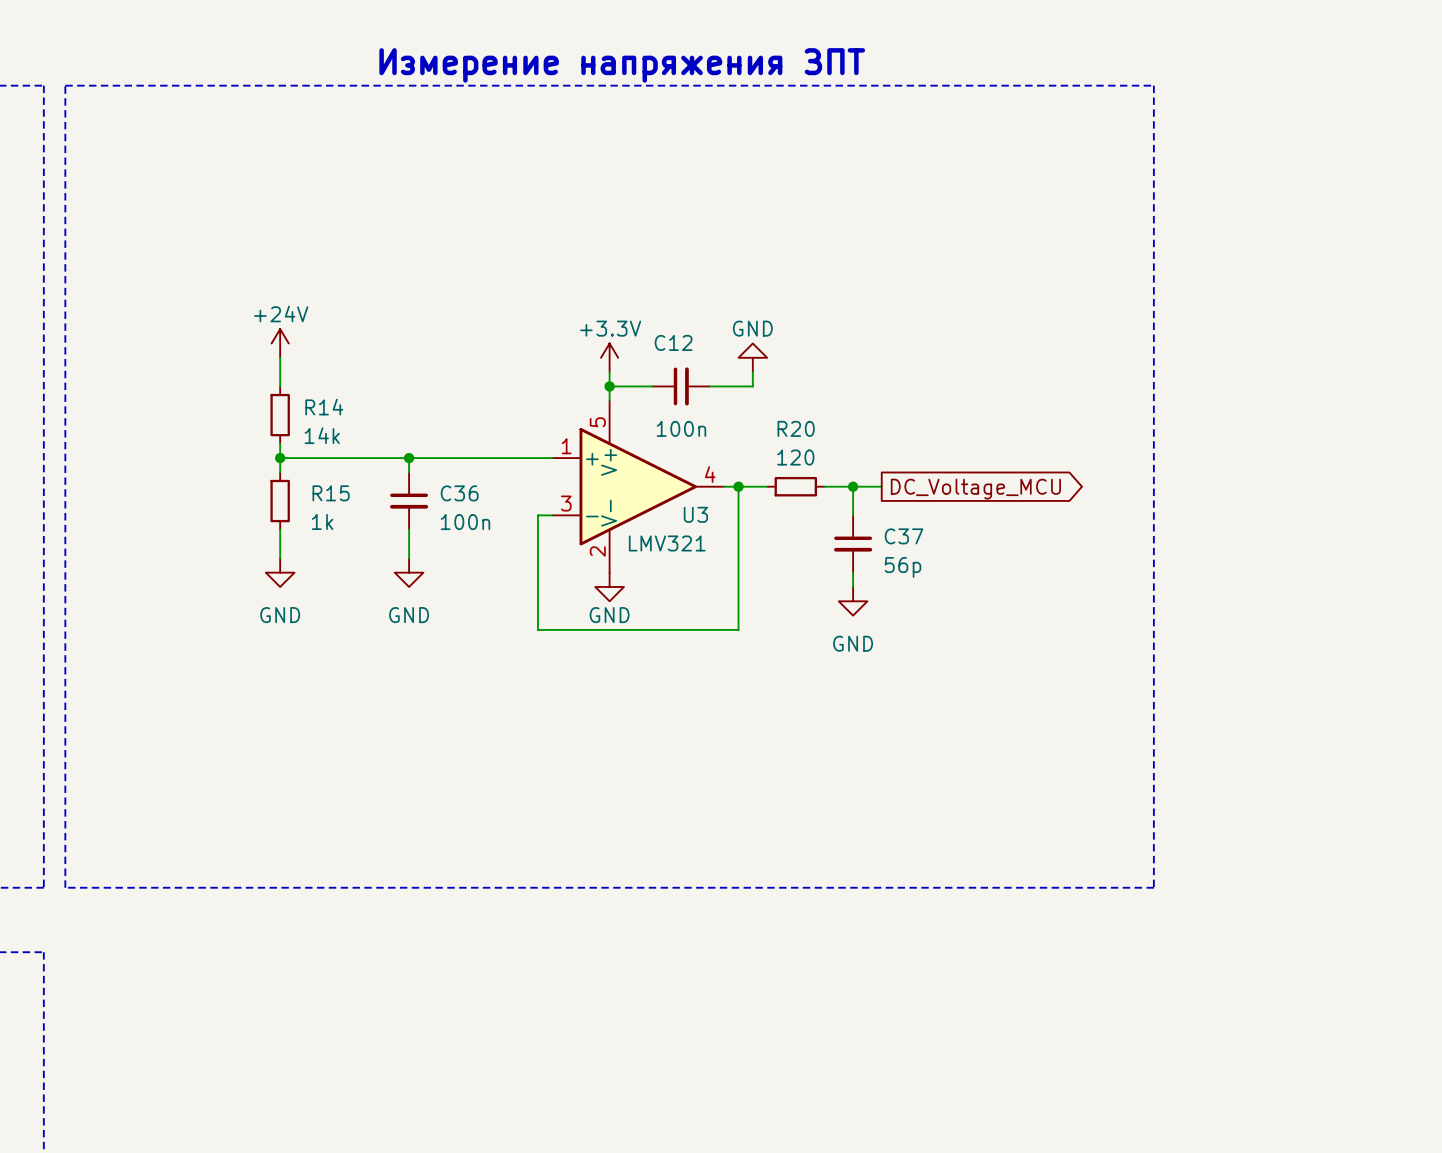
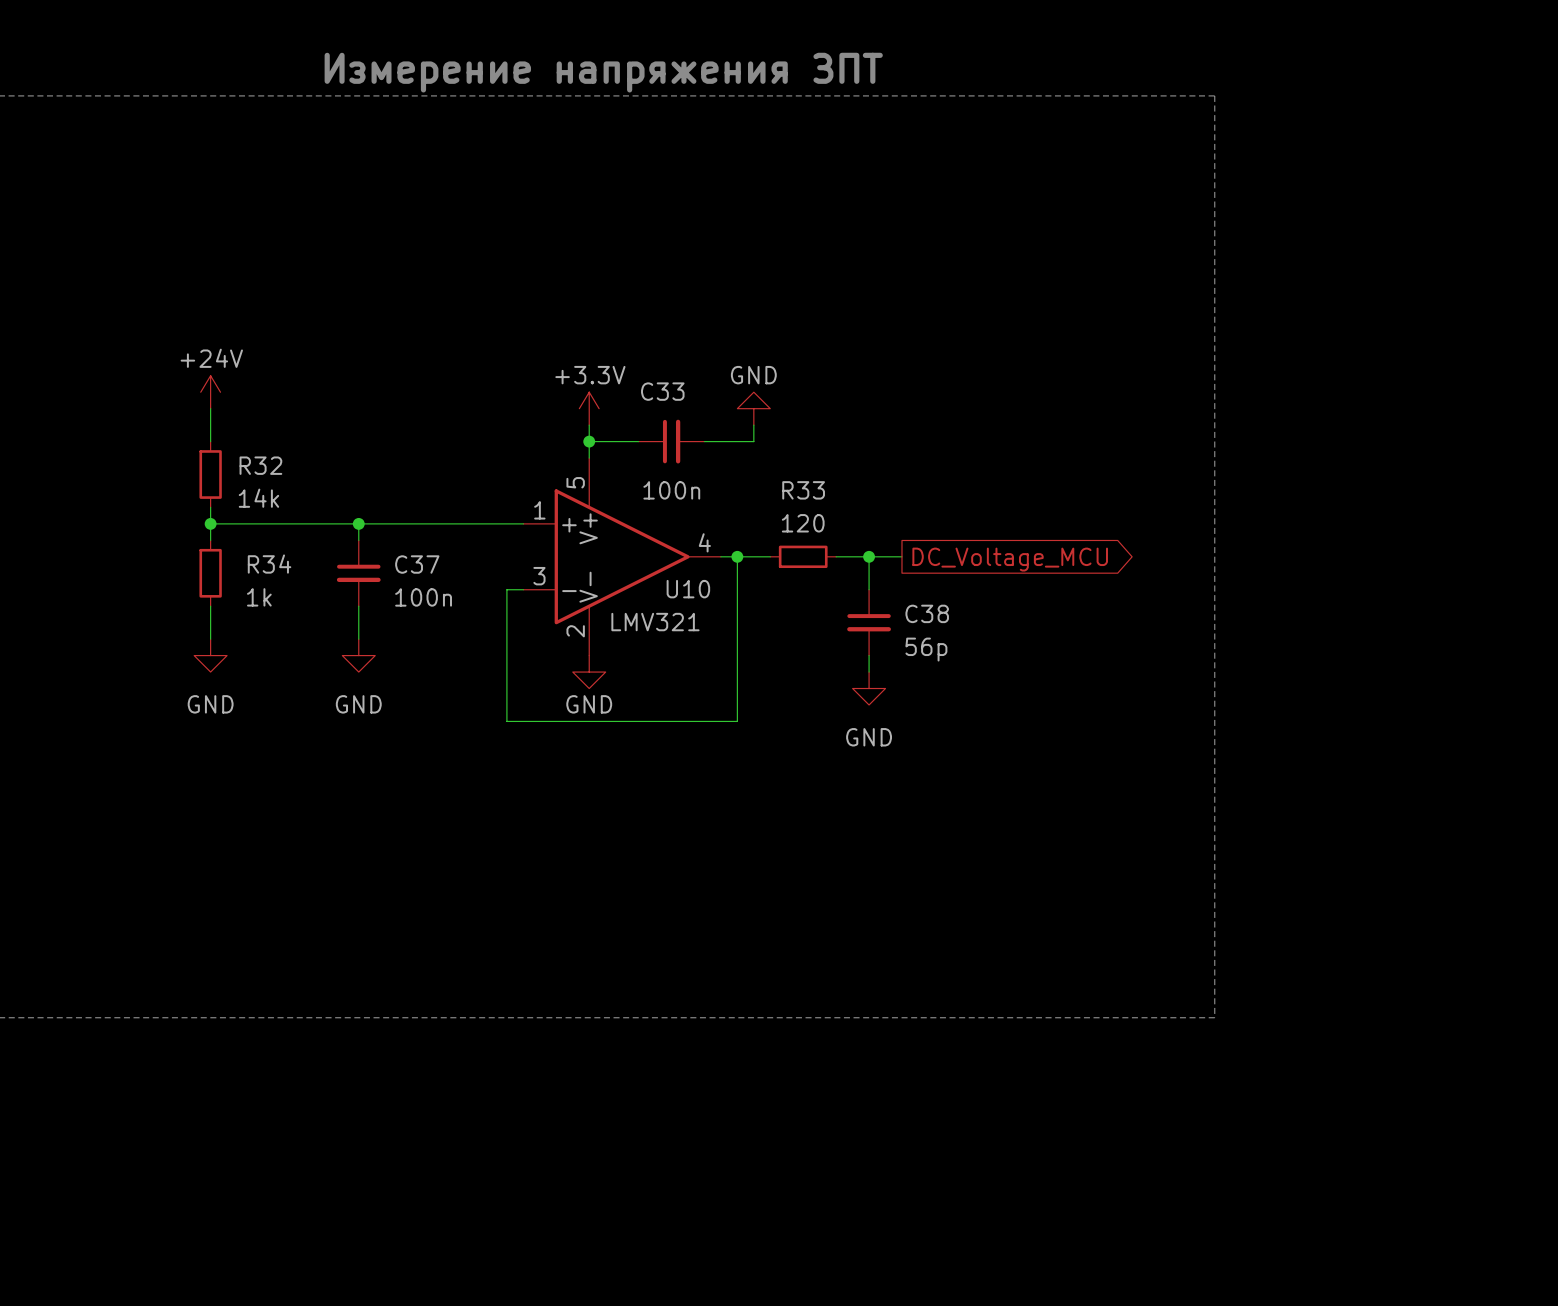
C12 name: C12 (673, 342) -> C33 (662, 391)
R14 name: R14 (324, 407) -> R32 (260, 465)
R20 name: R20 (796, 428) -> R33 (803, 490)
R15 name: R15 (331, 493) -> R34 (269, 564)
C36 name: C36 (459, 493) -> C37 (417, 564)
U3 name: U3 (695, 514) -> U10 (688, 589)
C37 name: C37 (904, 536) -> C38 (927, 613)

